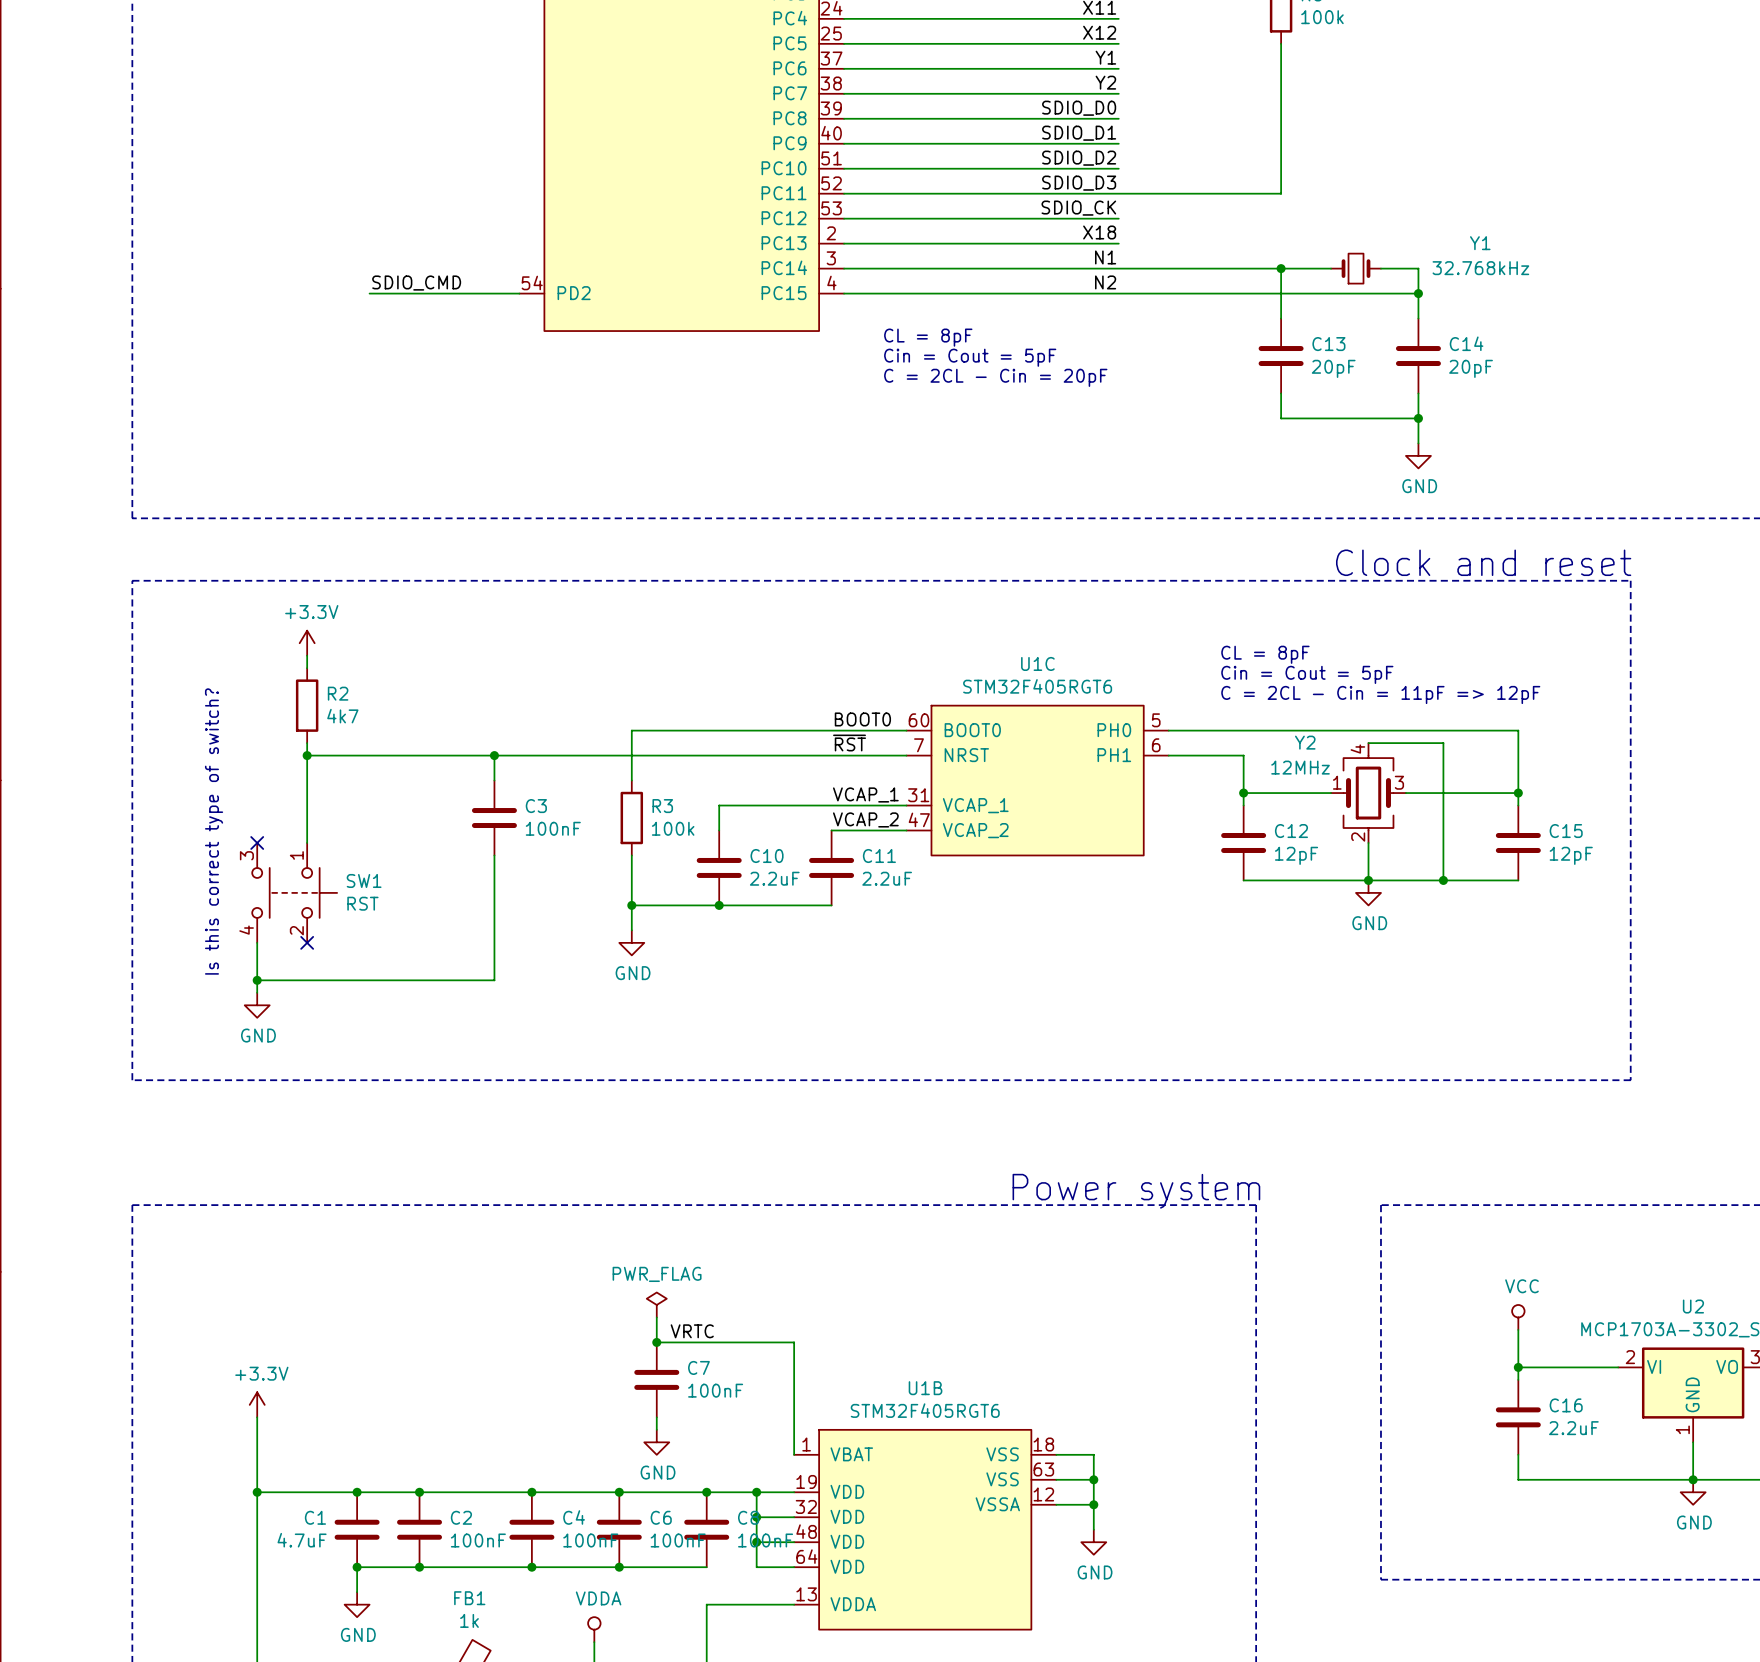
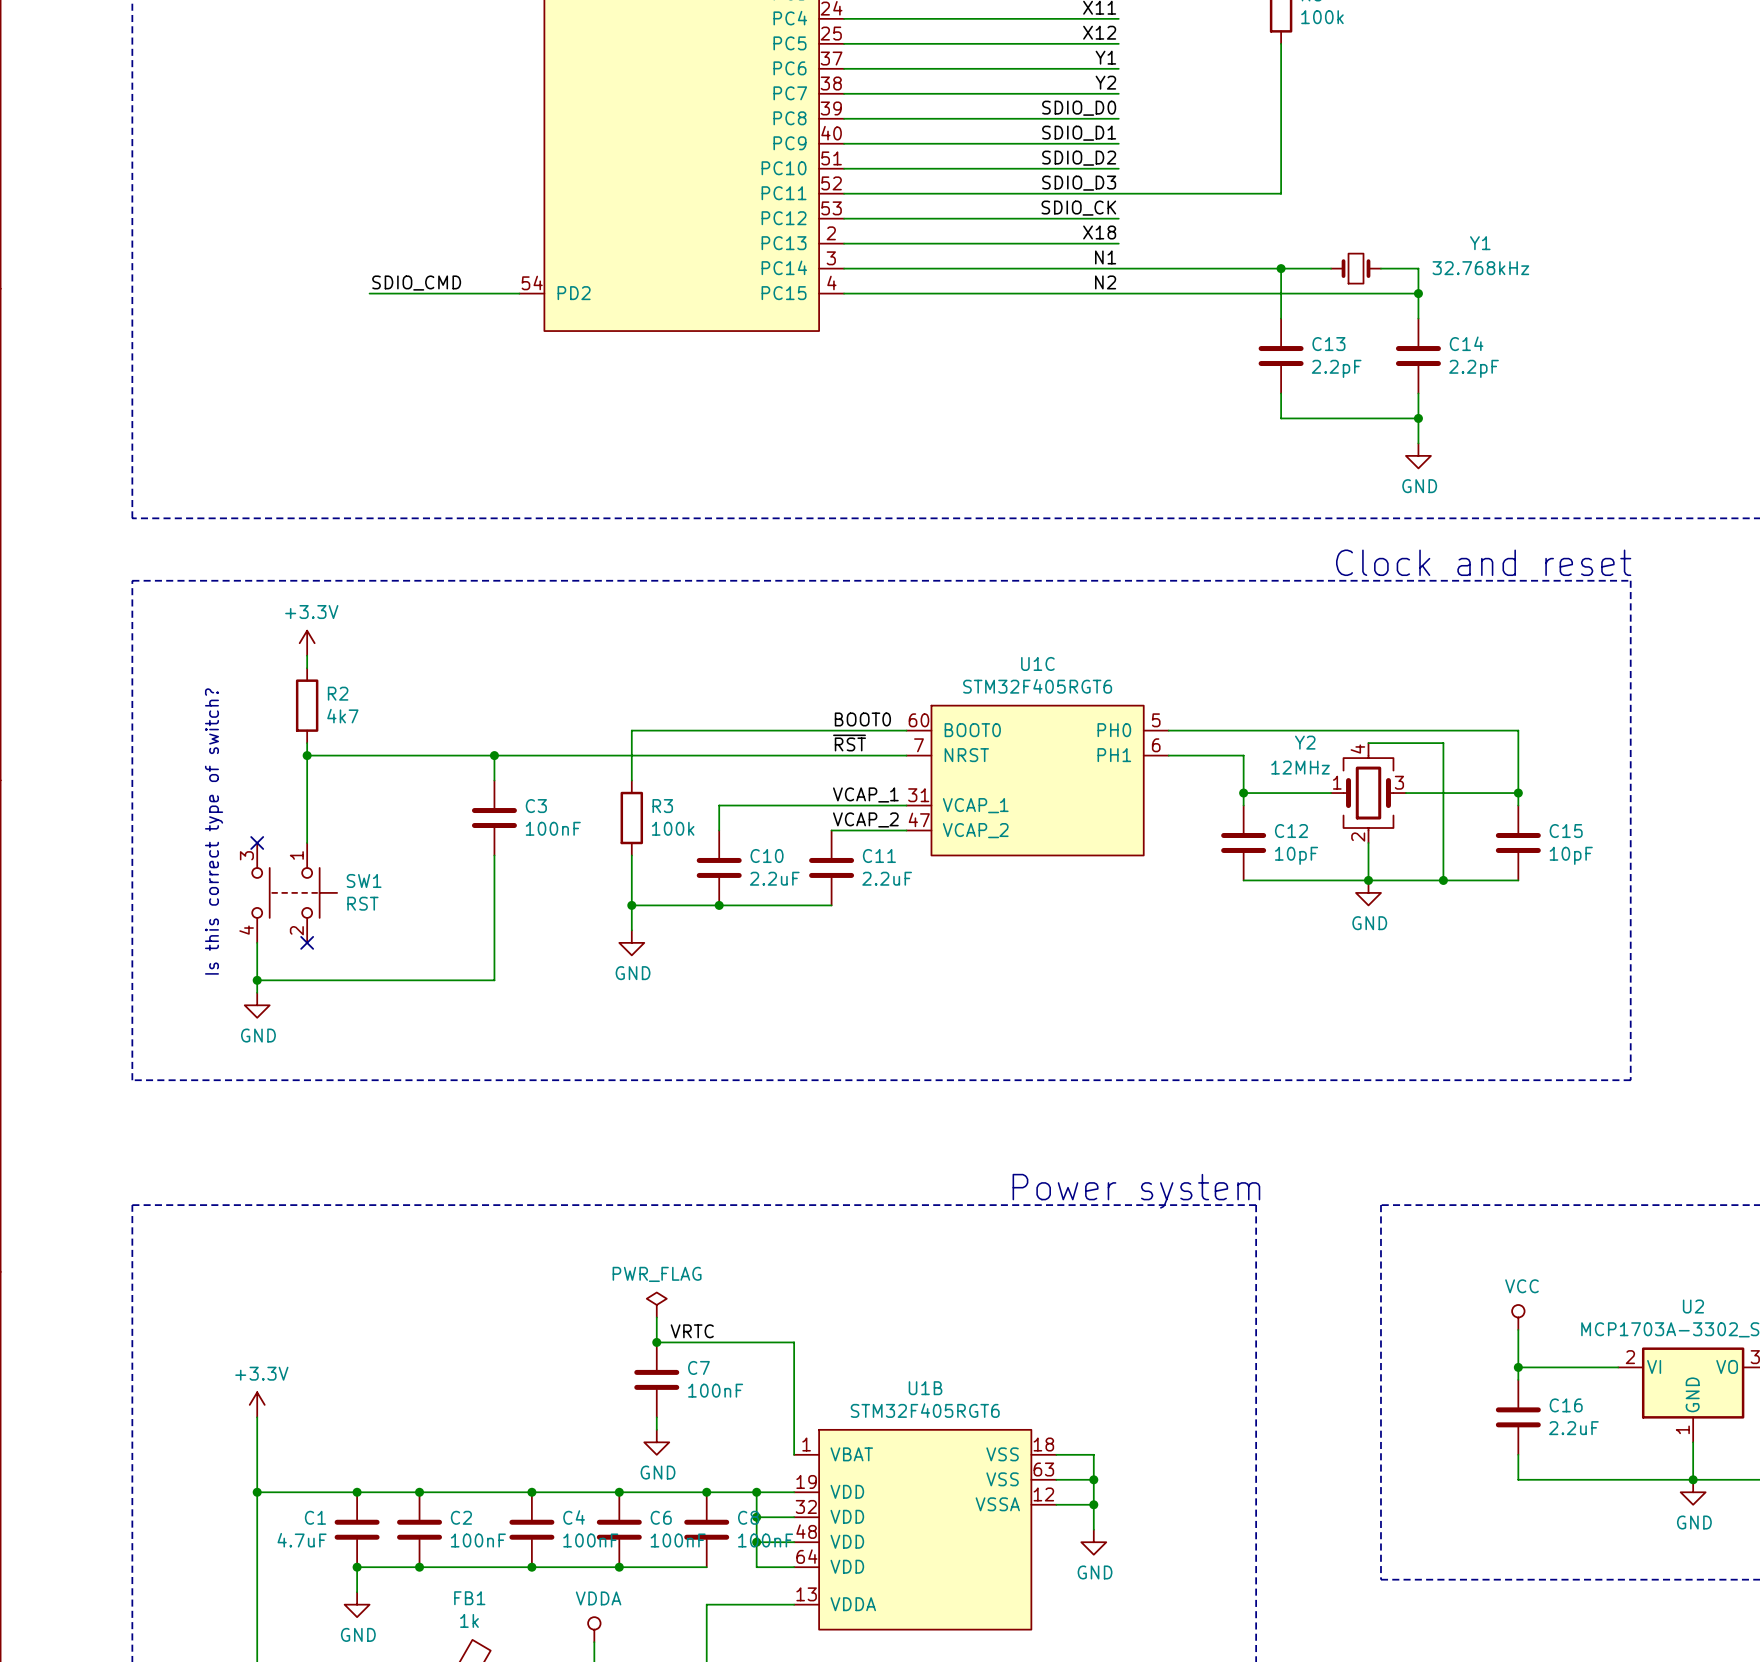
text: CL = 8pF (928, 337) -> none
text: Cin = Cout = 5pF (970, 357) -> none
C13 value: 20pF (1333, 368) -> 2.2pF (1336, 368)
C14 value: 20pF (1471, 368) -> 2.2pF (1474, 368)
text: C = 2CL - Cin = 20pF (995, 377) -> none
text: CL = 8pF (1265, 654) -> none
text: Cin = Cout = 5pF (1307, 674) -> none
text: C = 2CL - Cin = 11pF => 12pF (1380, 694) -> none
C12 value: 12pF (1296, 855) -> 10pF (1296, 855)
C15 value: 12pF (1571, 855) -> 10pF (1571, 855)

